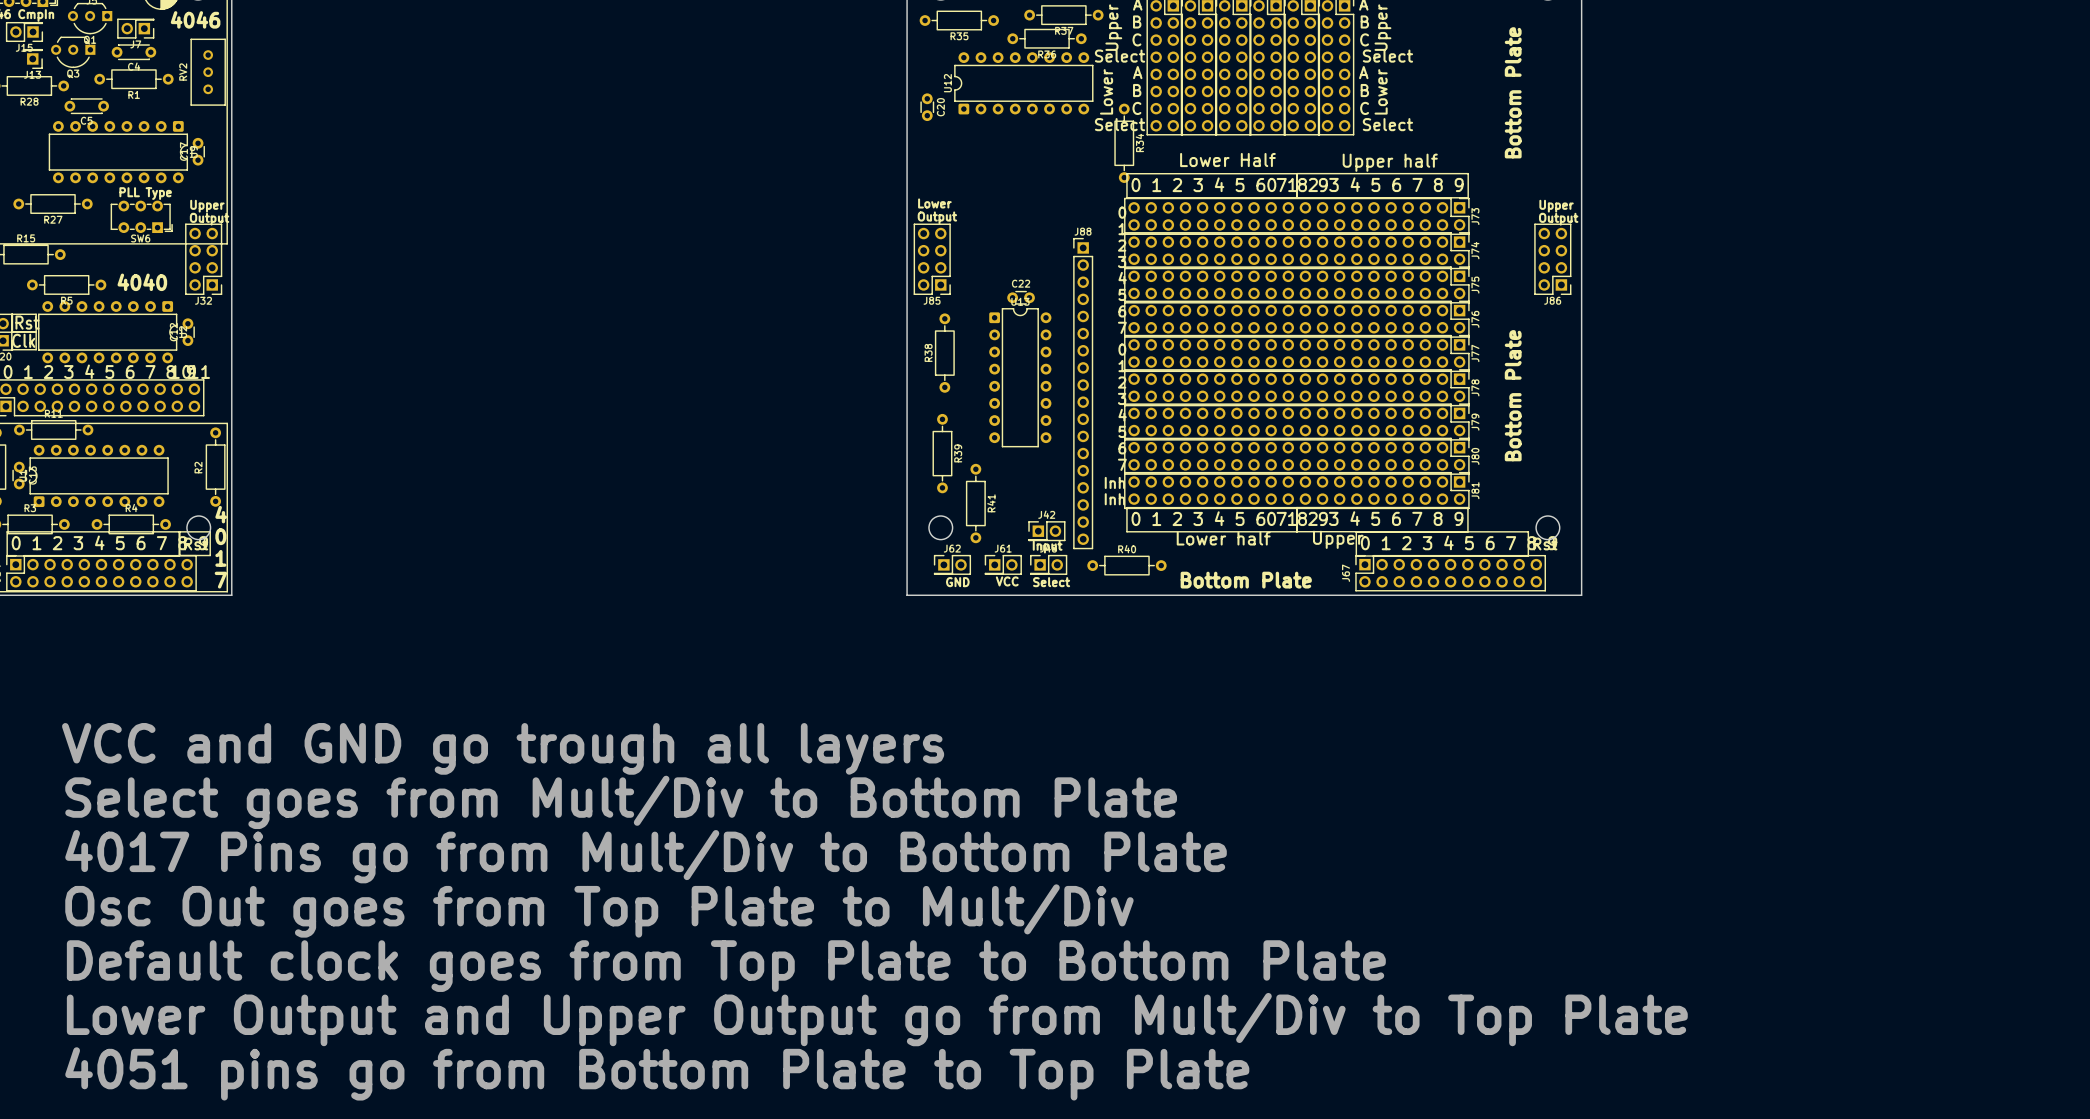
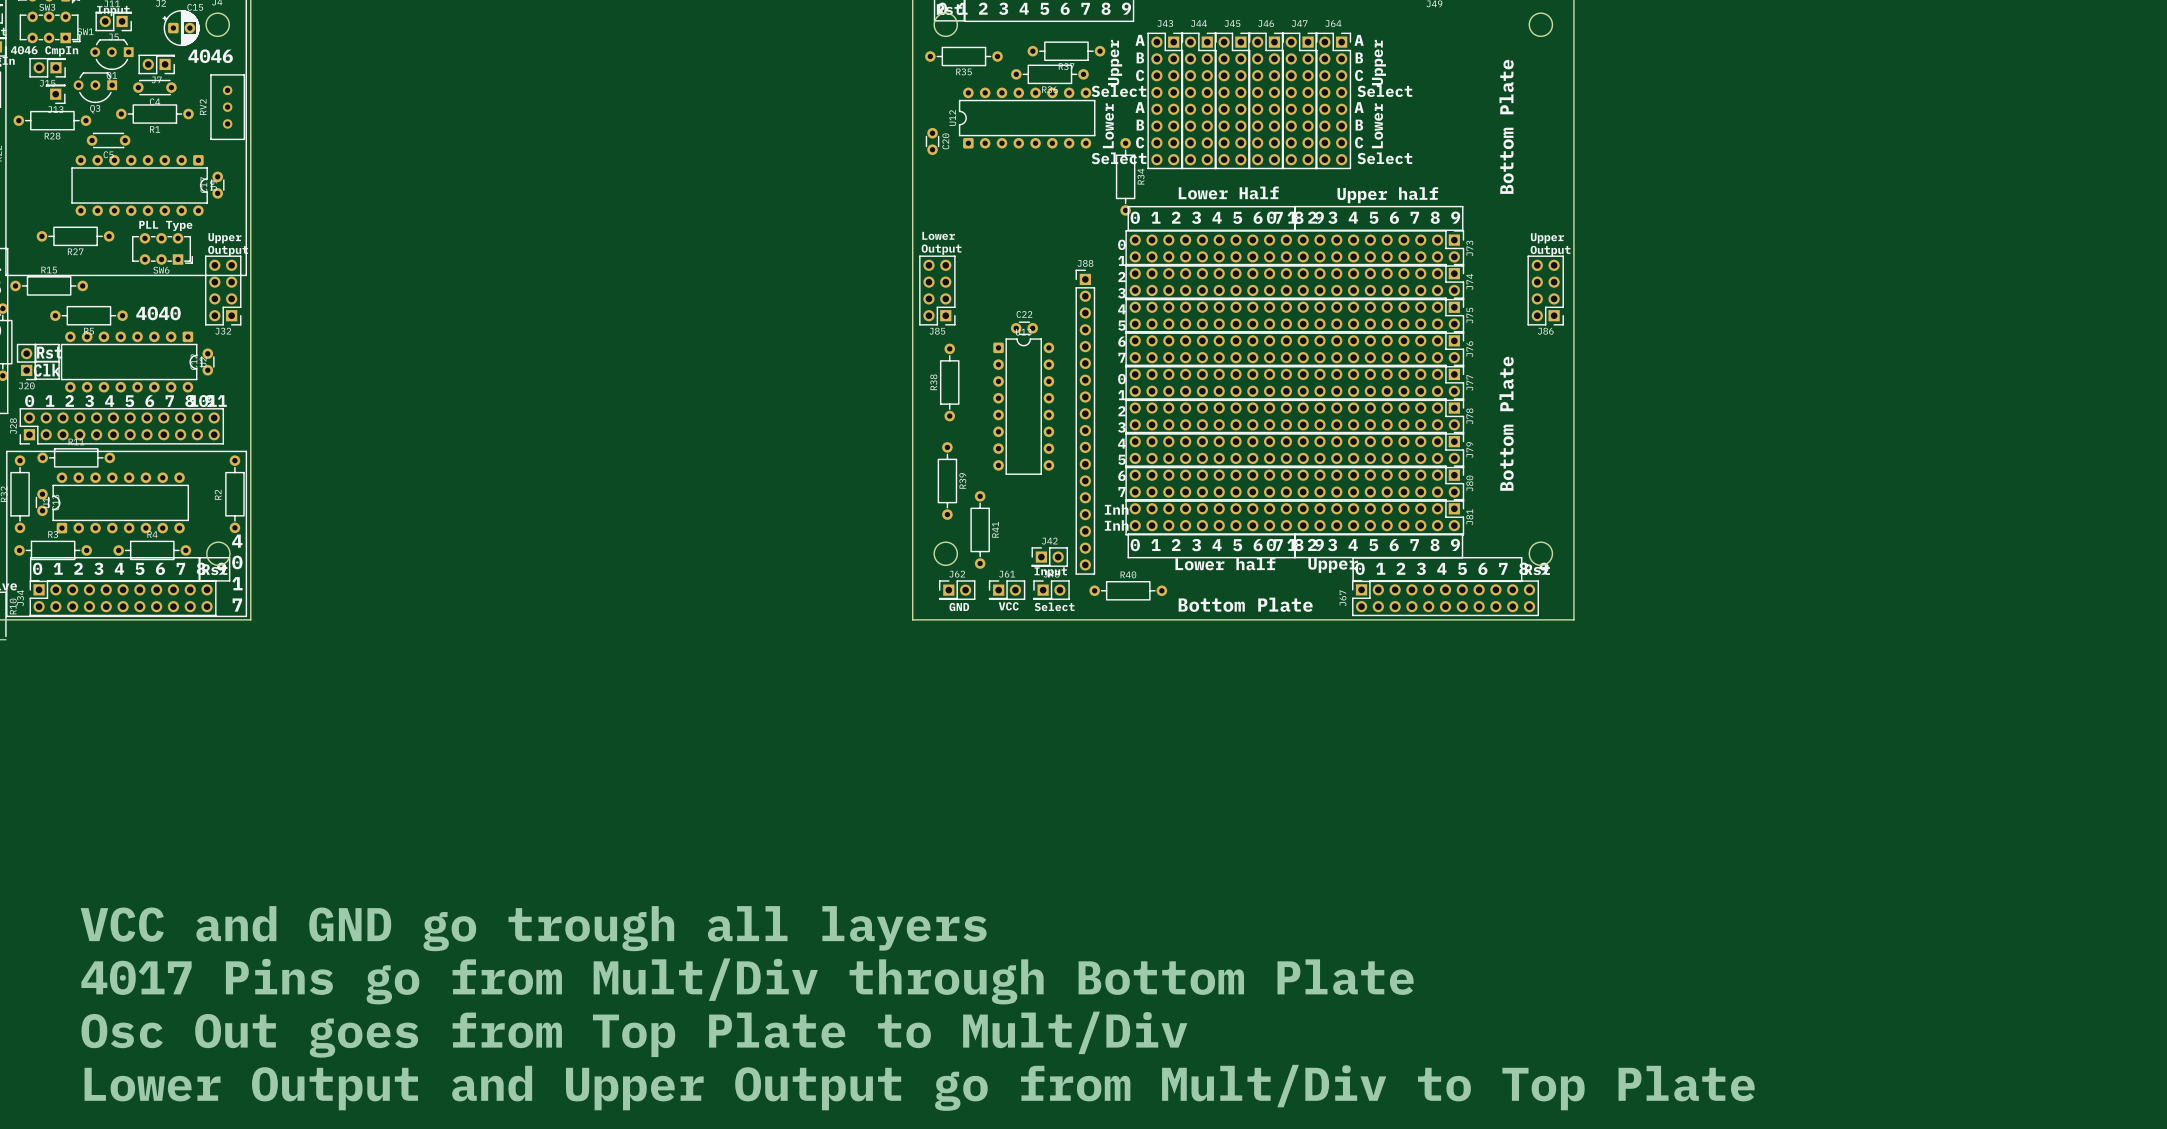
text: VCC and GND go trough all layers (503, 748) -> none
text: Select goes from Mult/Div to Bottom Plate (621, 802) -> none
text: 4017 Pins go from Mult/Div to Bottom Plate (646, 856) -> none
text: Osc Out goes from Top Plate to Mult/Div (599, 910) -> VCC and GND go trough all layers (533, 928)
text: Default clock goes from Top Plate to Bottom Plate (726, 966) -> 4017 Pins go from Mult/Div through Bottom Plate (747, 981)
text: Lower Output and Upper Output go from Mult/Div to Top Plate (877, 1019) -> Osc Out goes from Top Plate to Mult/Div (634, 1034)
text: 4051 pins go from Bottom Plate to Top Plate (657, 1073) -> Lower Output and Upper Output go from Mult/Div to Top Plate (919, 1087)

